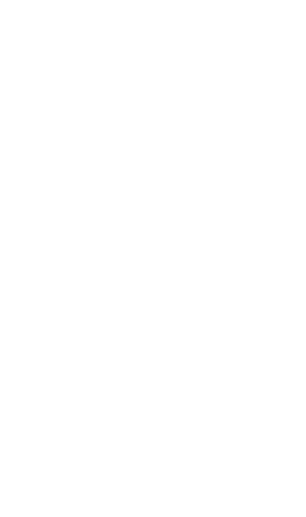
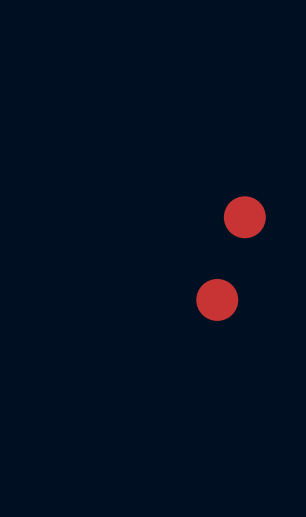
part: none -> (244, 217)
part: none -> (217, 299)

